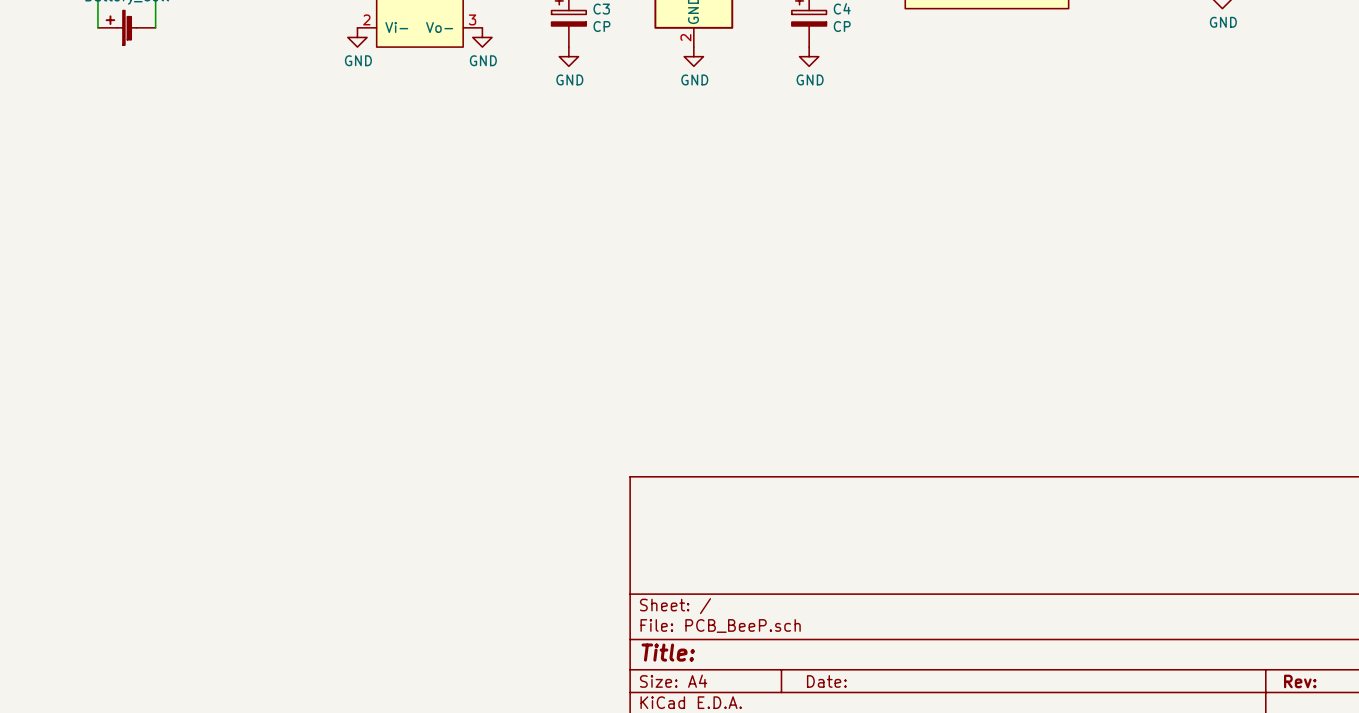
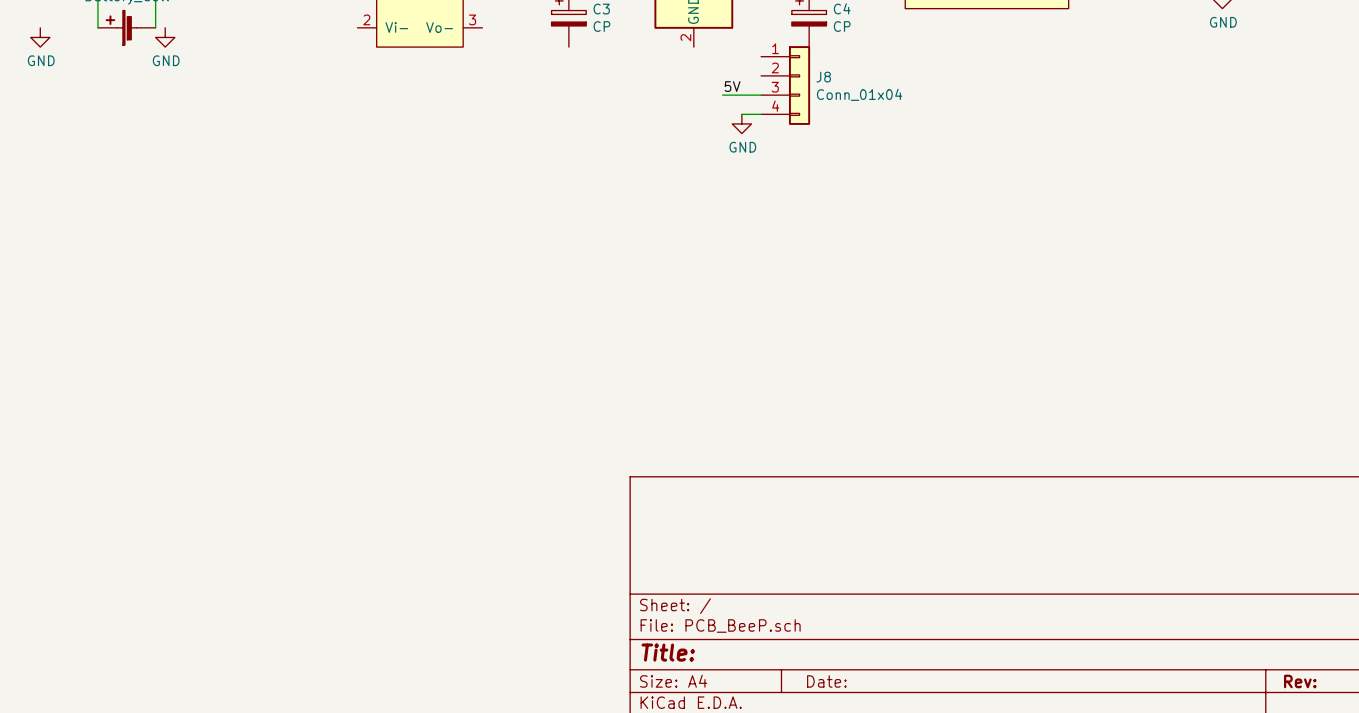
power symbol: none -> GND (40, 37)
power symbol: none -> GND (165, 37)
power symbol: GND (357, 37) -> none
power symbol: GND (482, 37) -> none
power symbol: GND (568, 56) -> none
power symbol: GND (693, 56) -> none
power symbol: GND (809, 56) -> none
J8: none -> Conn_01x04 (785, 85)
label: none -> 5V (732, 86)
wire: none -> (722, 95) (761, 95)
wire: none -> (741, 114) (761, 114)
power symbol: none -> GND (741, 123)

